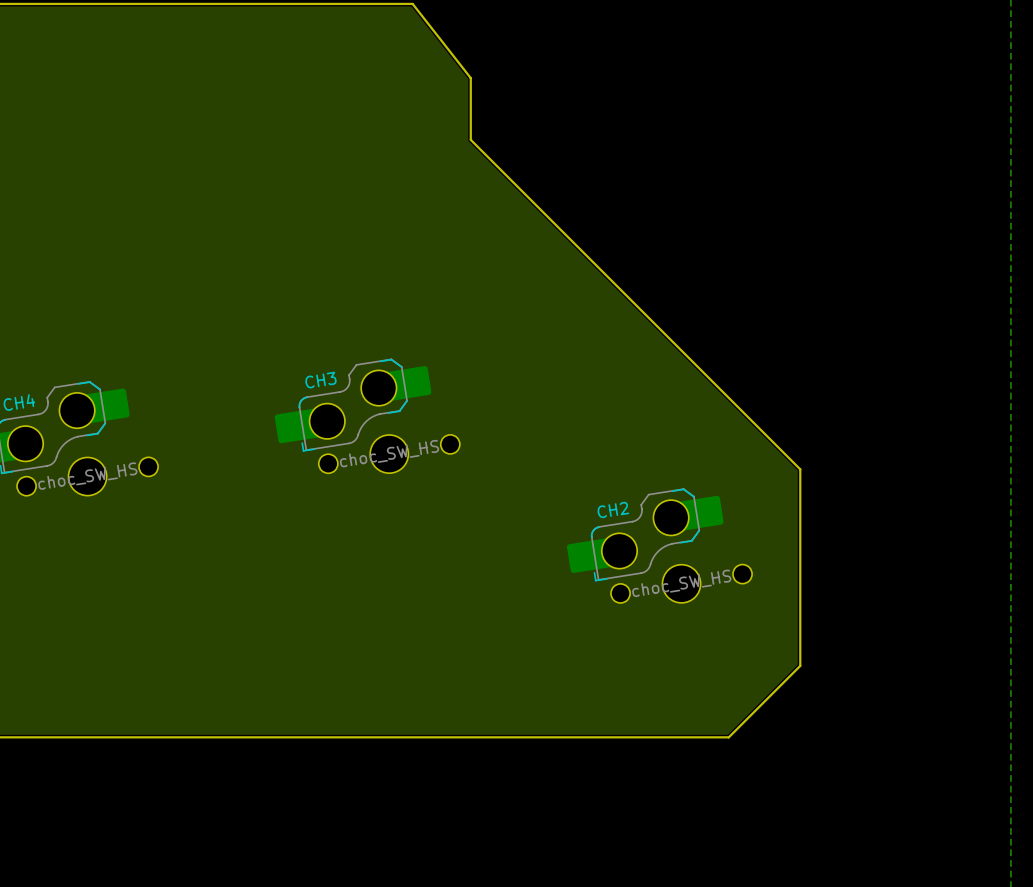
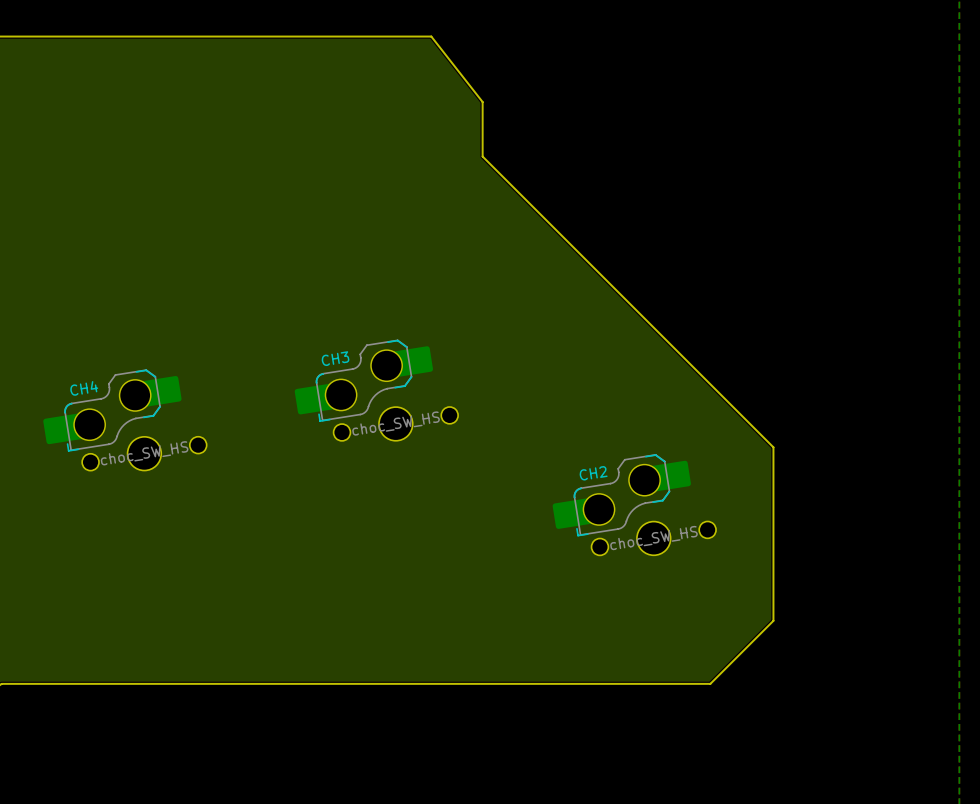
CH3 position: (367, 416) -> (376, 390)
CH2 position: (659, 545) -> (634, 504)

